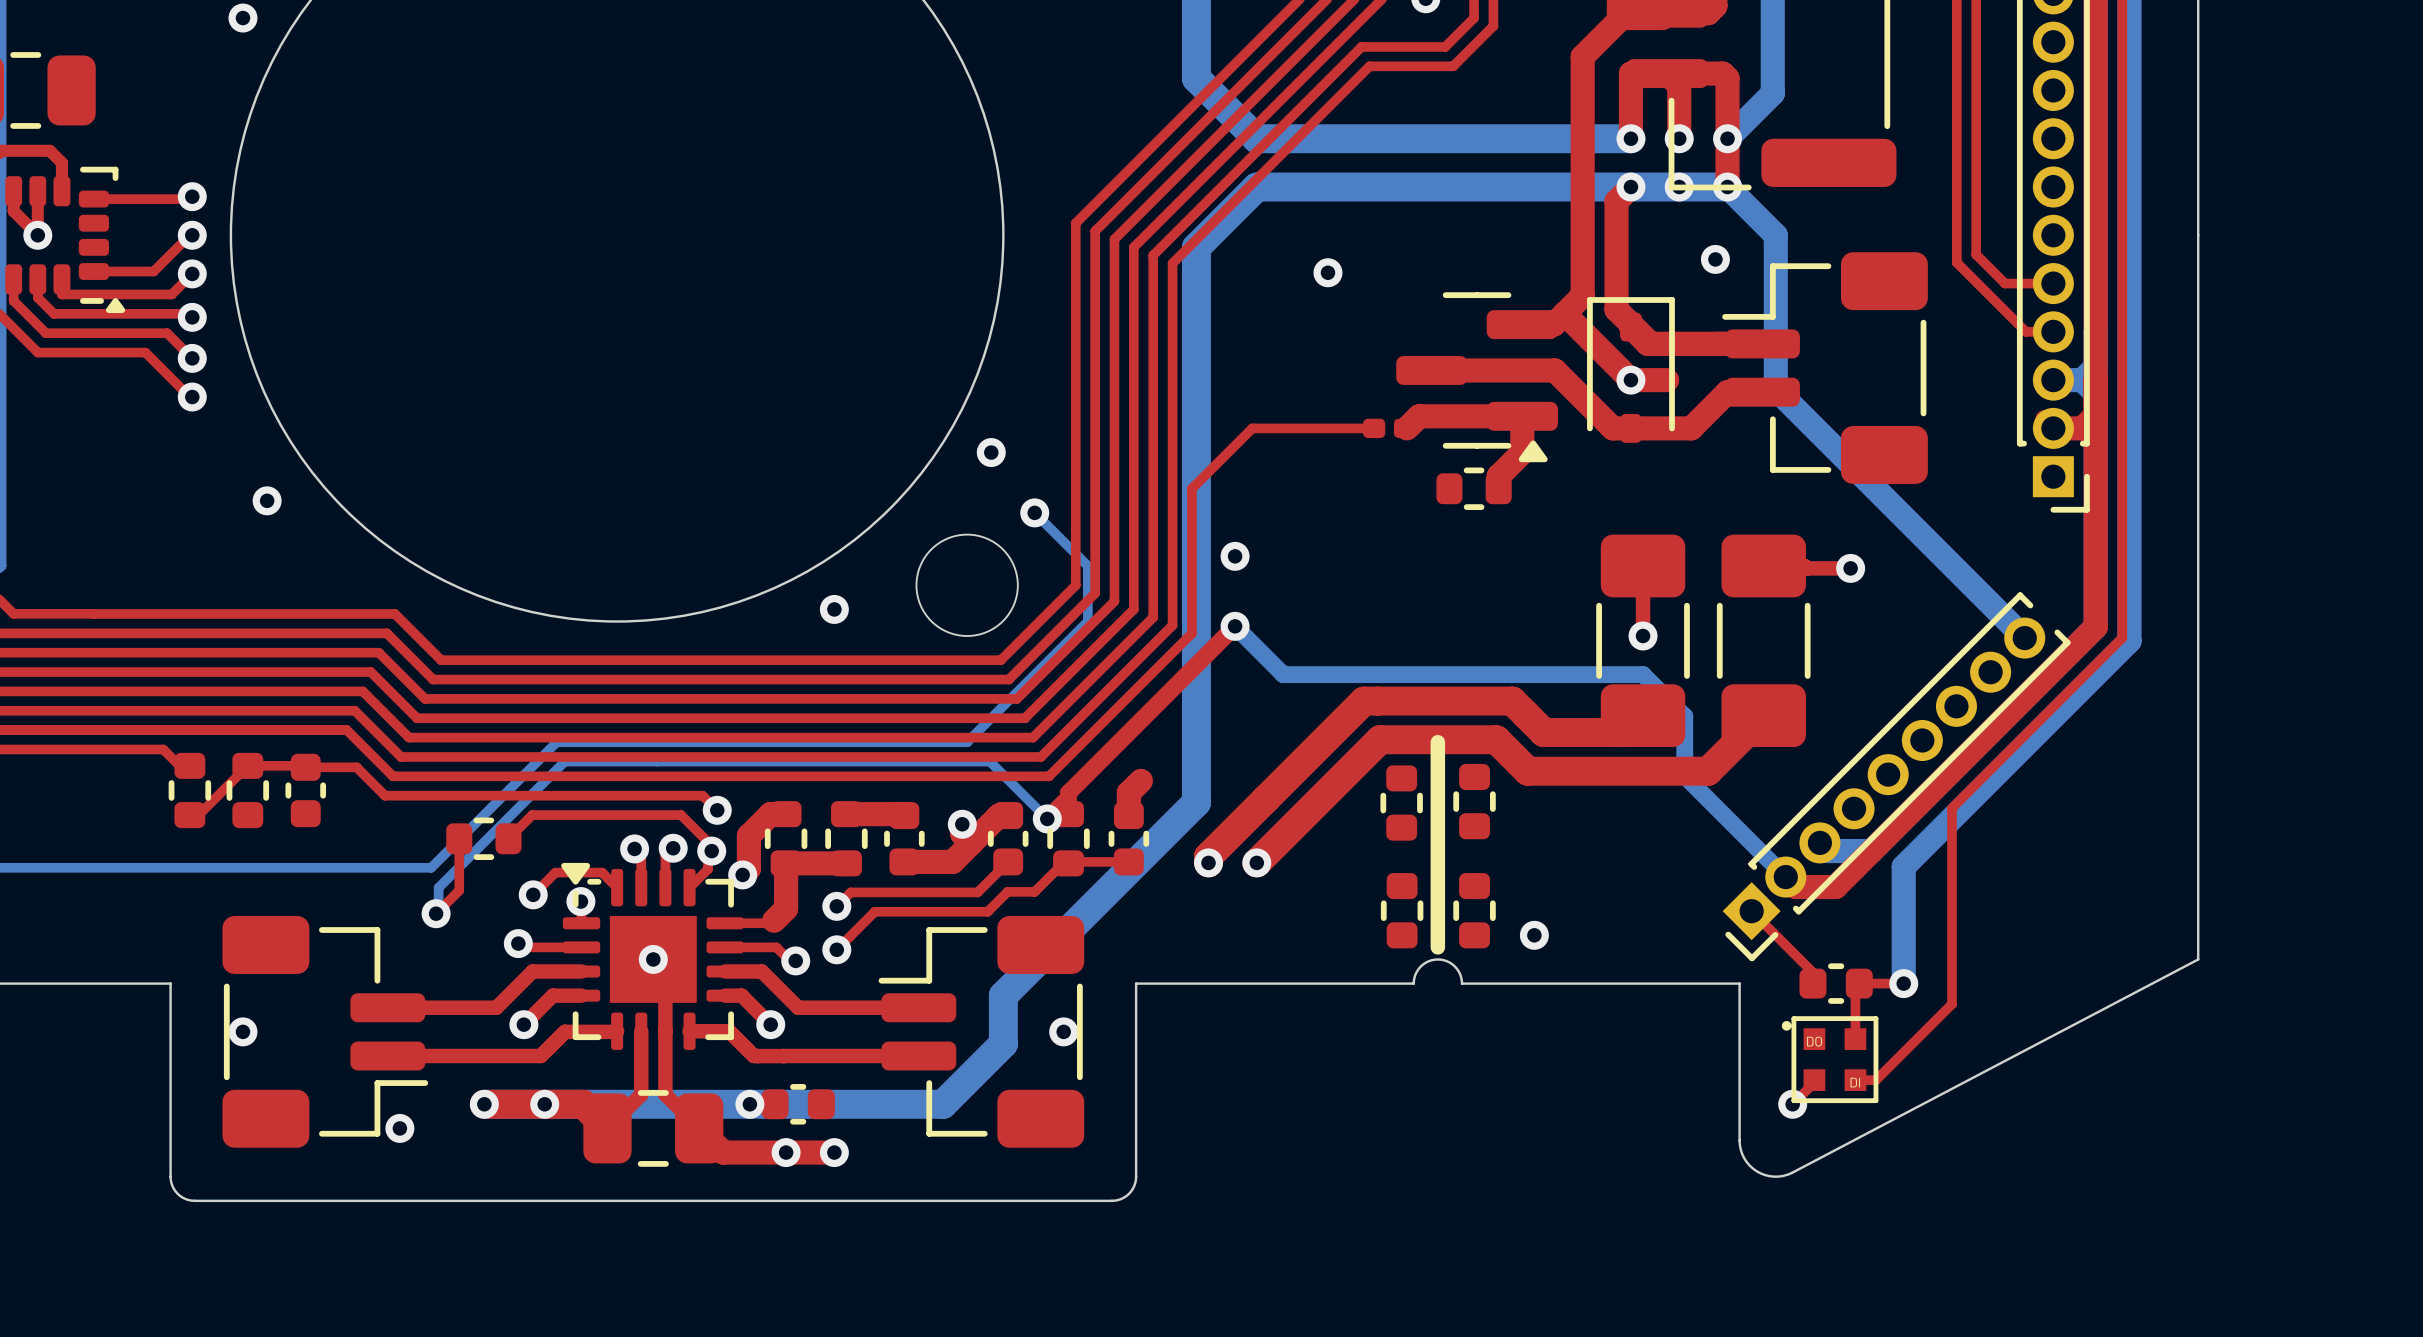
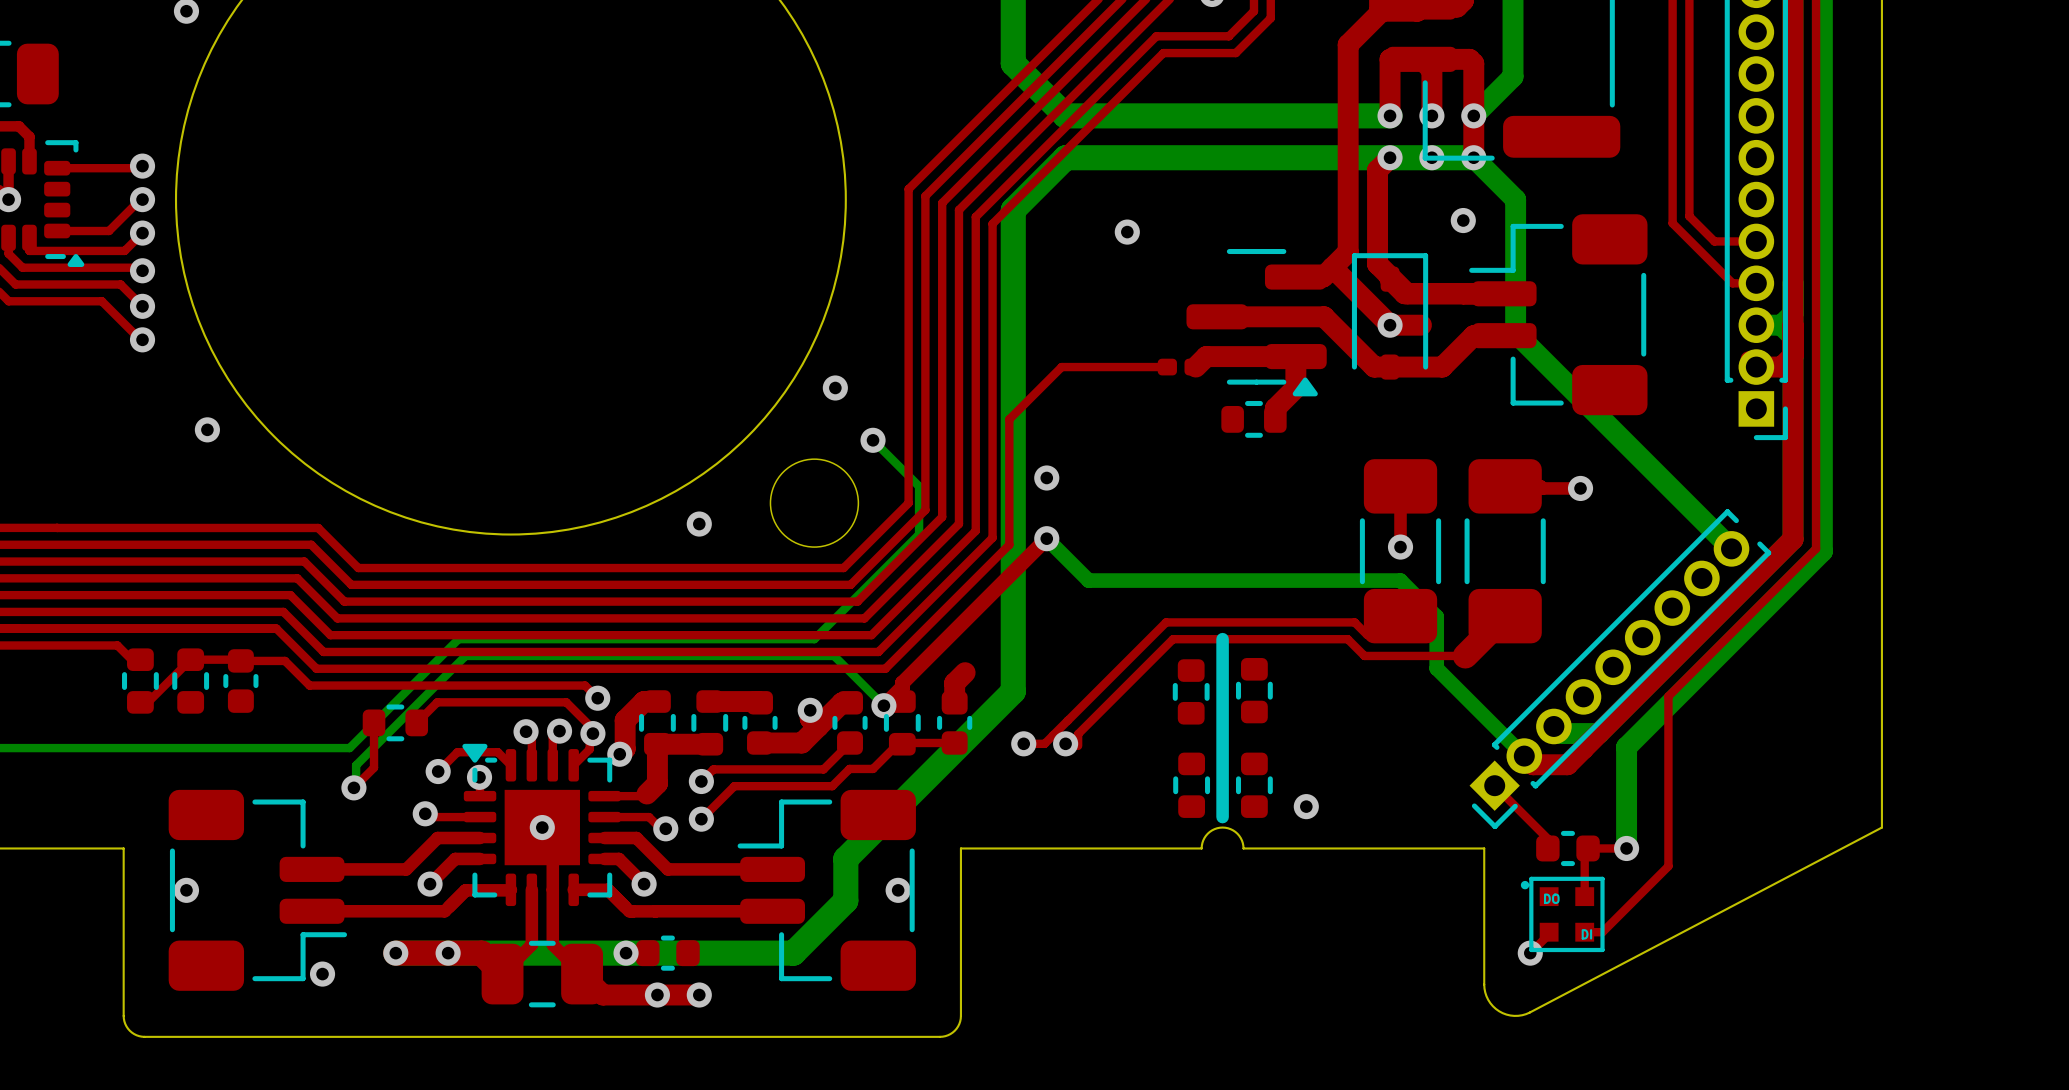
top track: (1643, 715) (1643, 718) (1628, 732) (1543, 732) (1512, 701) (1363, 701) (1208, 856) (1208, 862) -> (1400, 616) (1381, 634) (1367, 634) (1354, 622) (1166, 622) (1044, 743) (1023, 743)
top track: (1717, 761) (1708, 771) (1527, 771) (1496, 739) (1379, 739) (1256, 862) -> (1465, 655) (1364, 655) (1347, 639) (1173, 639) (1078, 734) (1078, 745)

